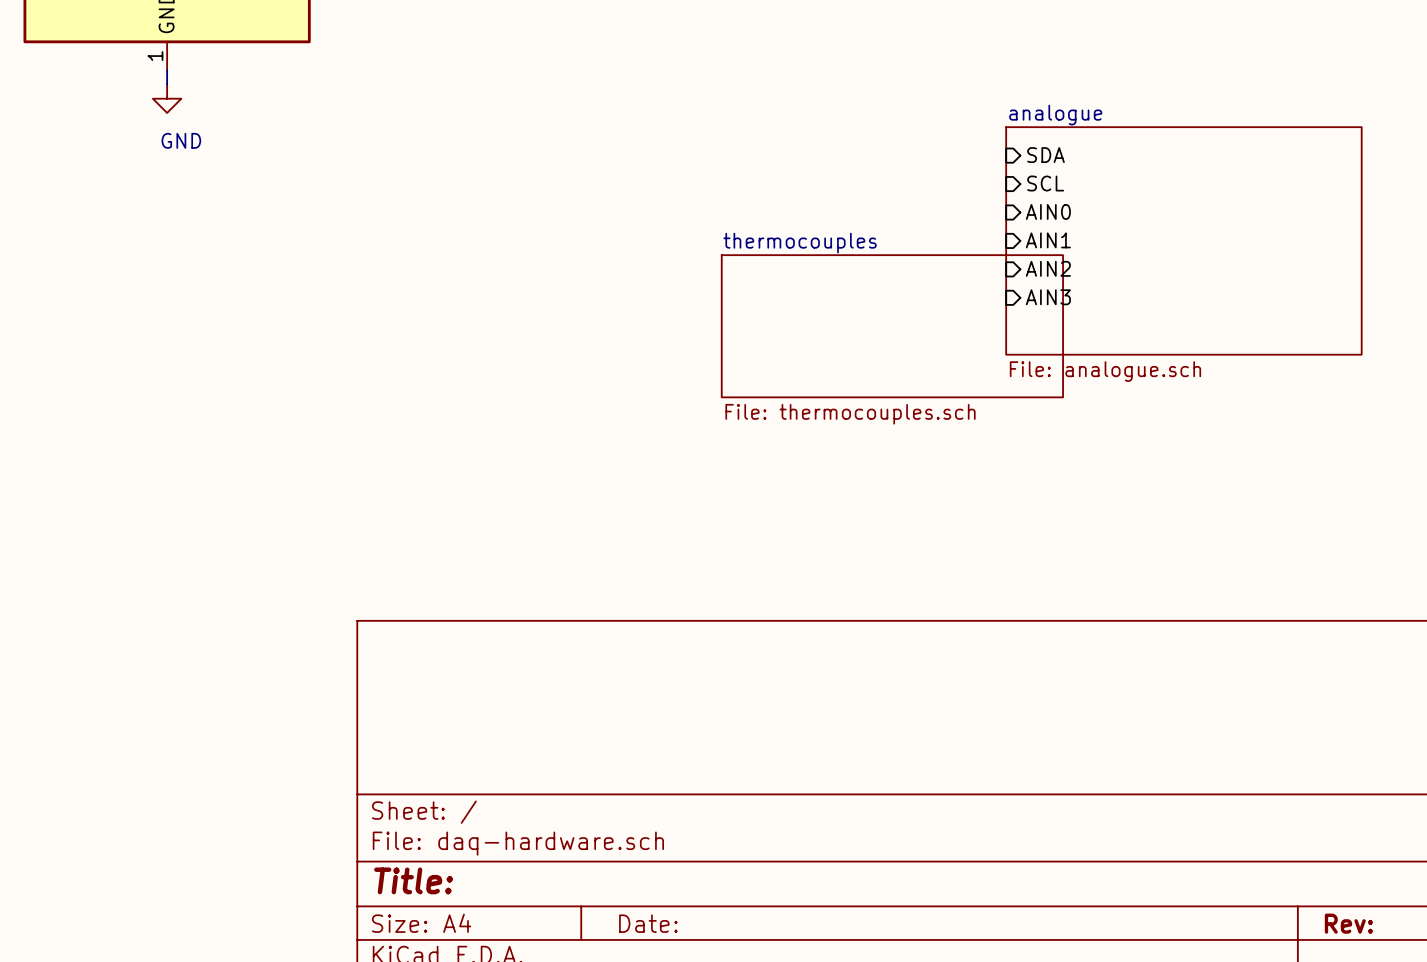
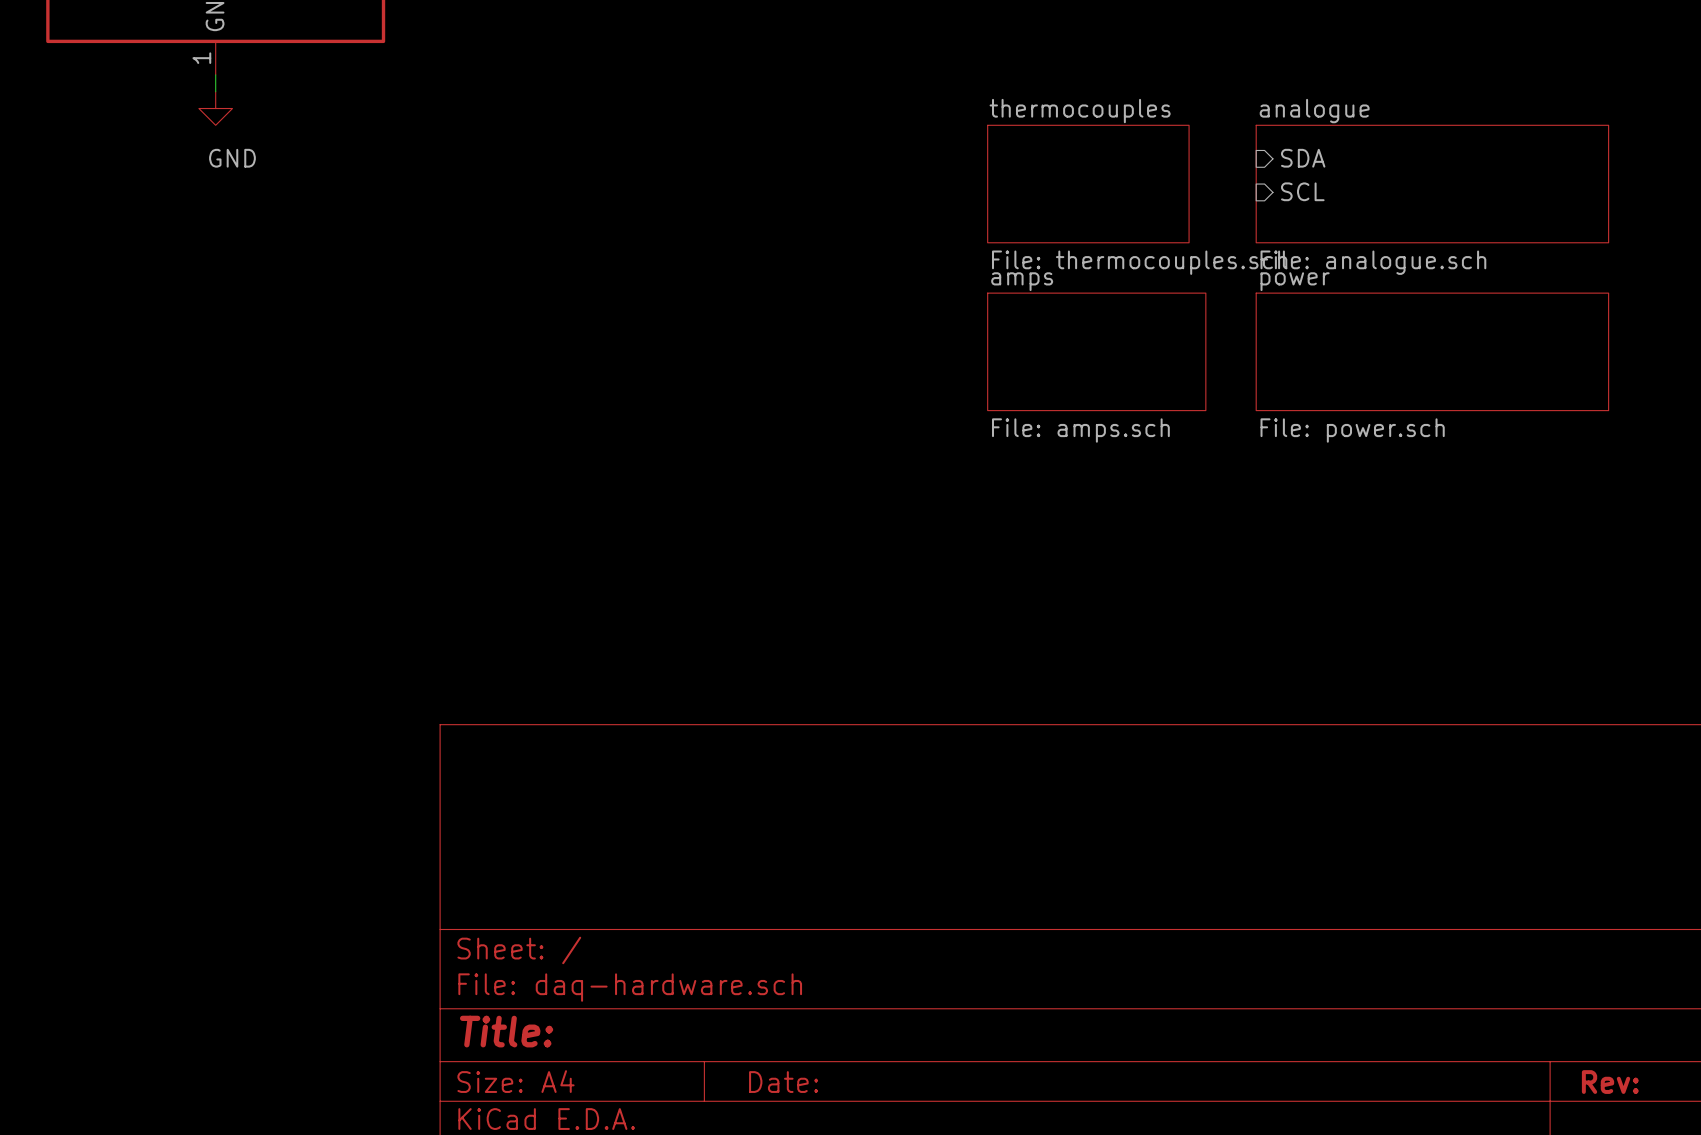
sheet pin position: SDA (1046, 155) -> SDA (1303, 158)
sheet thermocouples: none -> File: thermocouples.sch (1088, 184)
sheet analogue: none -> File: analogue.sch (1432, 184)
sheet pin position: SCL (1045, 183) -> SCL (1302, 191)
sheet pin: AIN0 (1048, 211) -> none
sheet pin: AIN1 (1048, 240) -> none
sheet analogue: File: analogue.sch (1183, 240) -> none
sheet pin: AIN2 (1048, 268) -> none
sheet pin: AIN3 (1048, 297) -> none
sheet amps: none -> File: amps.sch (1096, 351)
sheet power: none -> File: power.sch (1432, 351)
sheet thermocouples: File: thermocouples.sch (892, 326) -> none

